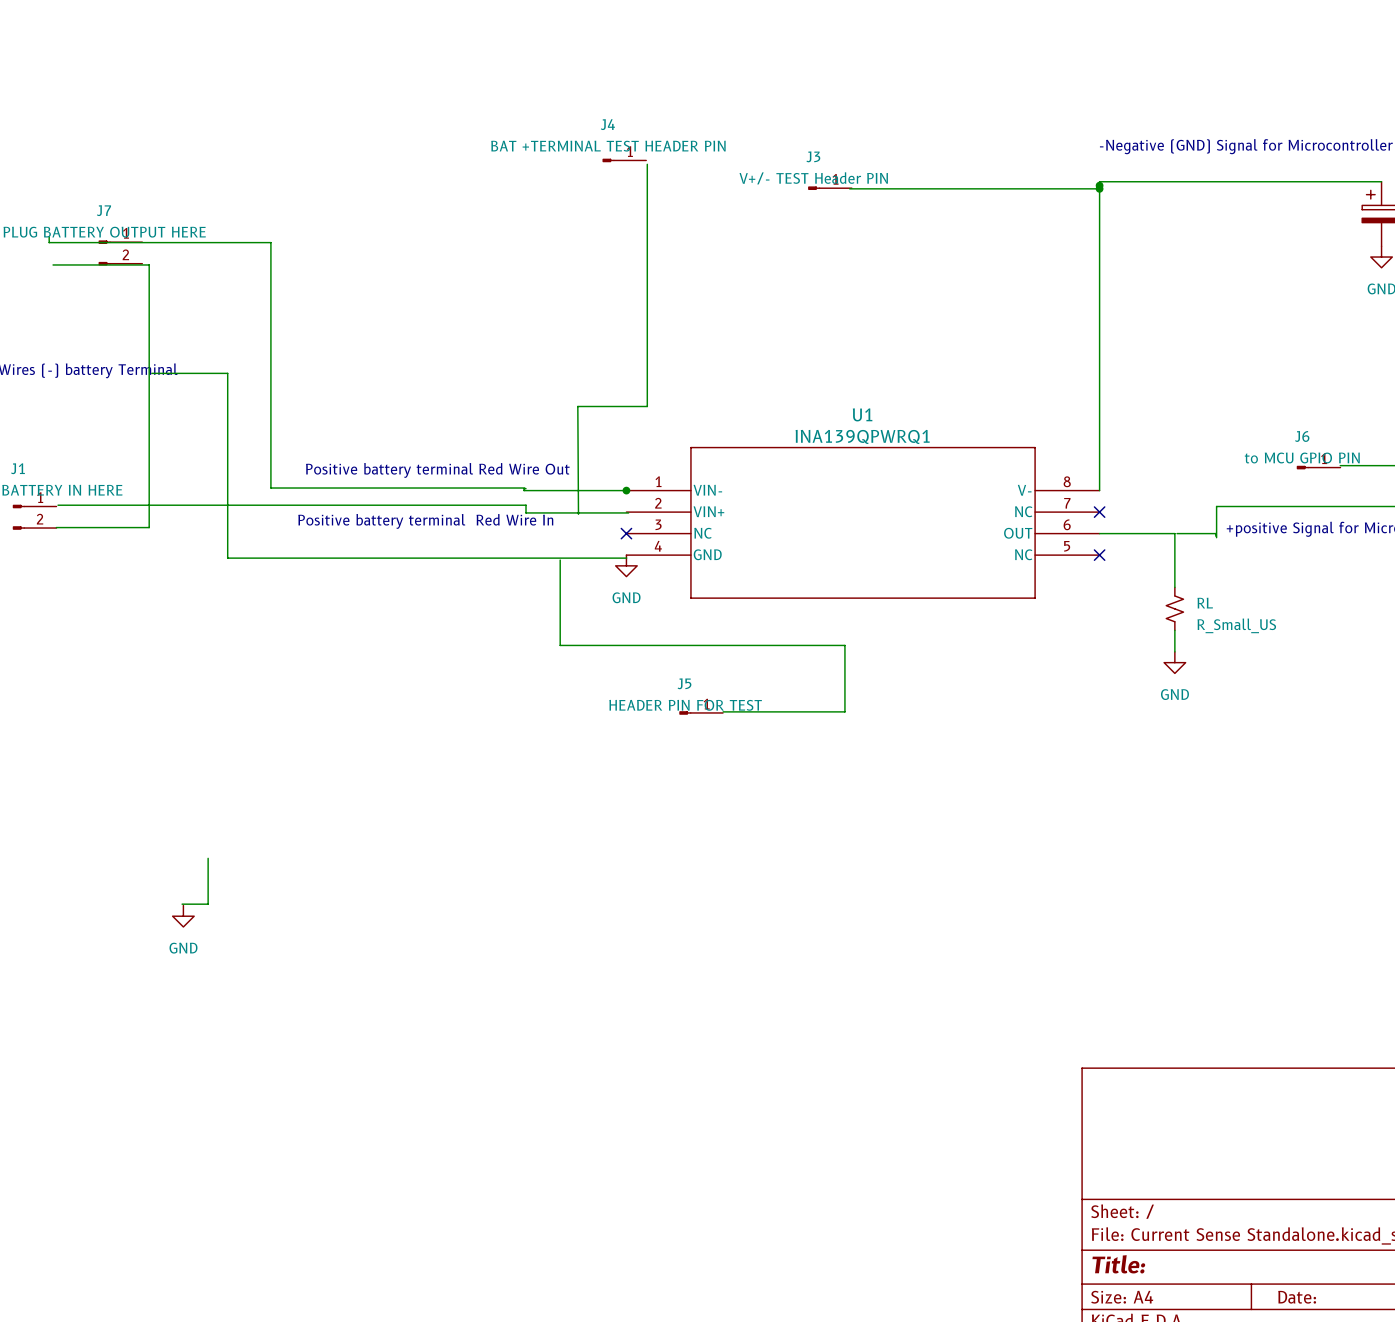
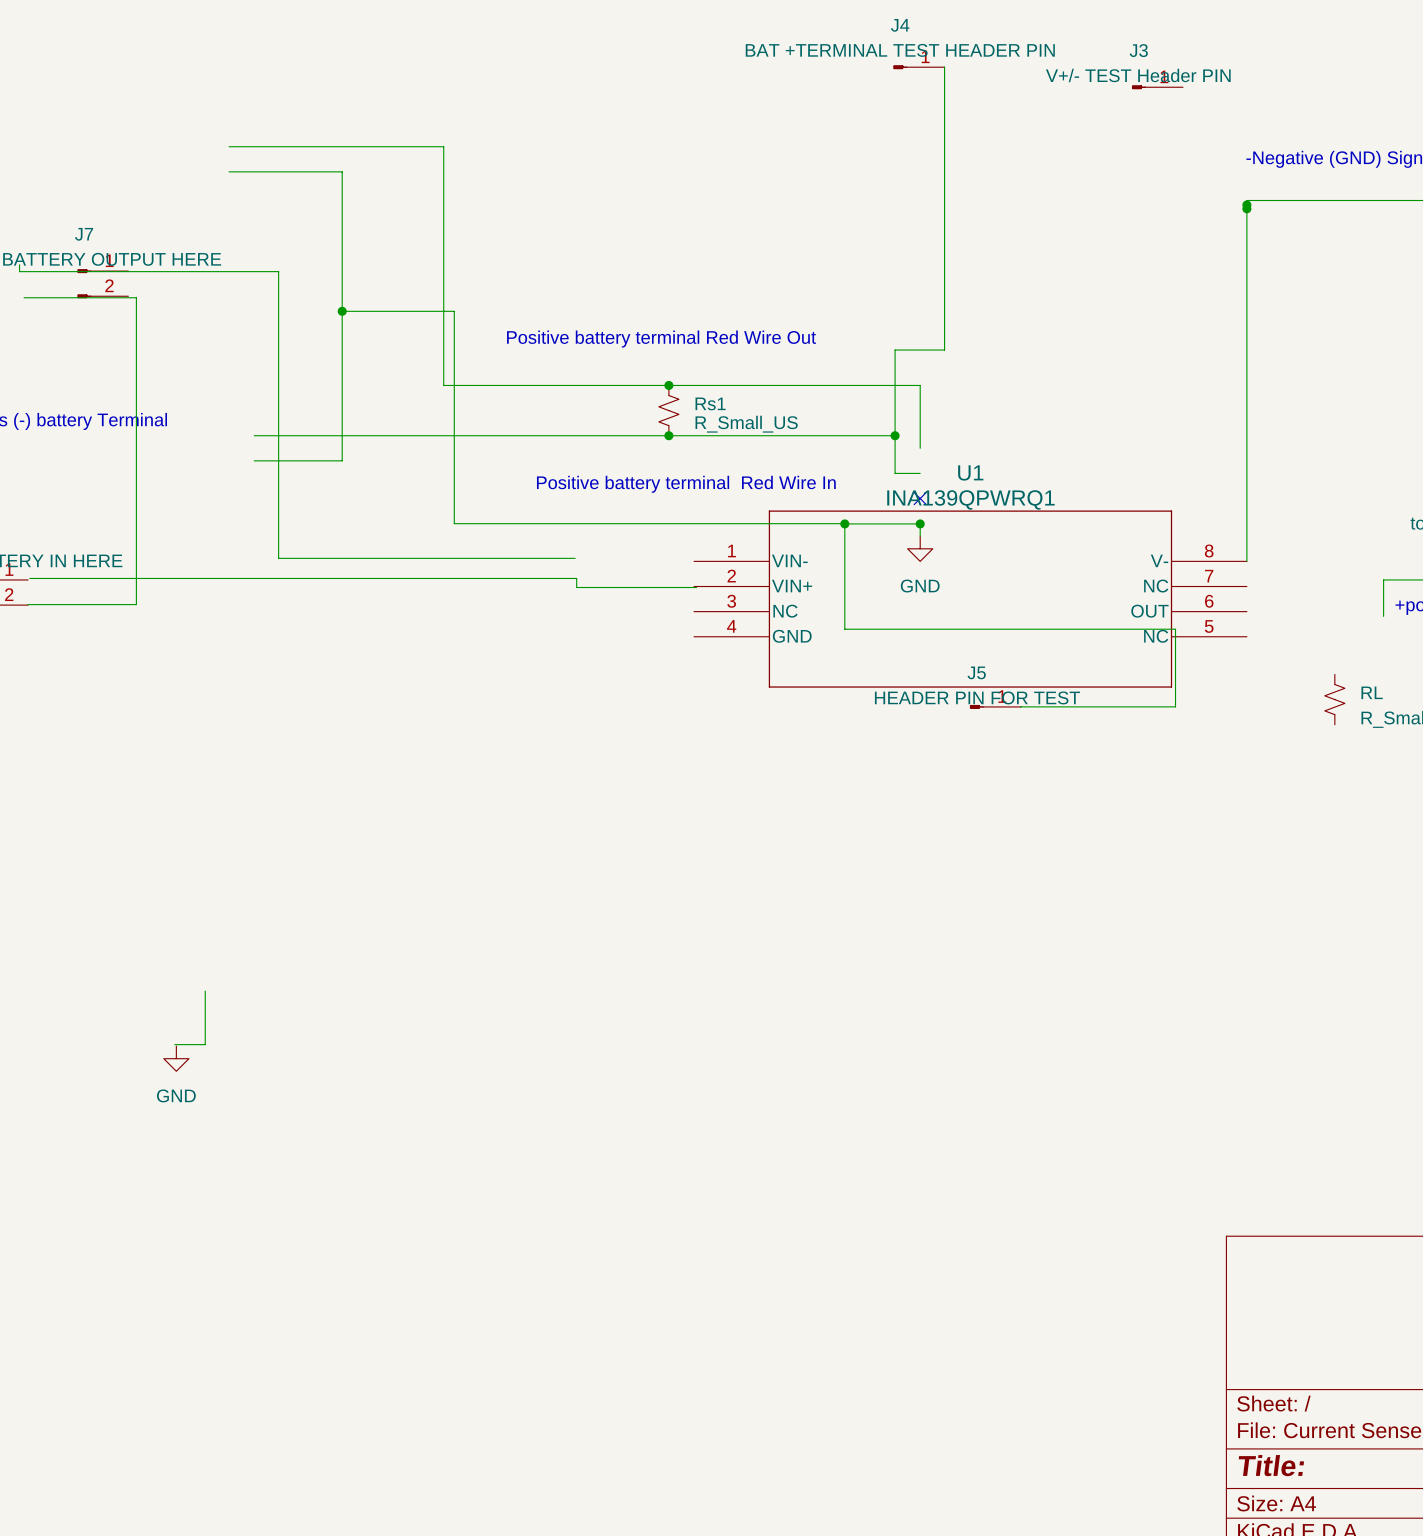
wire: none -> (944, 67) (944, 350) (895, 350) (895, 473) (920, 473)
wire: none -> (229, 146) (443, 146) (443, 385) (920, 385) (920, 448)
wire: none -> (229, 171) (342, 171) (342, 460) (254, 460)
J4 position: (624, 160) -> (918, 67)
wire: (647, 164) (647, 406) (577, 406) (578, 514) -> none
J3 position: (830, 188) -> (1157, 87)
wire: (849, 188) (1099, 188) -> none
wire: none -> (342, 311) (454, 311) (454, 523) (844, 523) (844, 629) (1175, 629) (1175, 706) (1020, 706)
junction: none -> (342, 311)
text: none -> Positive battery terminal Red Wire Out (661, 339)
junction: none -> (668, 385)
Rs1: none -> R_Small_US (668, 410)
wire: (151, 373) (227, 373) (227, 558) (626, 558) -> none
wire: none -> (254, 435) (895, 435)
junction: none -> (668, 435)
junction: none -> (895, 435)
text: none -> Positive battery terminal Red Wire In (686, 484)
no-connect mark: none -> (920, 498)
wire: none -> (844, 523) (920, 523)
junction: none -> (844, 523)
wire: none -> (920, 523) (920, 536)
junction: none -> (920, 523)
text: Positive battery terminal Red Wire Out (437, 470) -> none
power symbol: none -> GND (920, 548)
wire: (526, 488) (524, 490) (628, 490) -> none
junction: (626, 490) -> none
no-connect mark: (1099, 512) -> none
text: Positive battery terminal Red Wire In (425, 521) -> none
no-connect mark: (626, 533) -> none
wire: (1099, 533) (1174, 533) (1174, 587) -> none
wire: (1177, 533) (1215, 533) (1215, 536) -> none
no-connect mark: (1099, 555) -> none
wire: (560, 560) (560, 645) (844, 645) (844, 711) (723, 711) -> none
power symbol: GND (626, 565) -> none
wire: (1174, 630) (1174, 651) -> none
power symbol: GND (1174, 662) -> none
J5 position: (701, 712) -> (995, 706)

